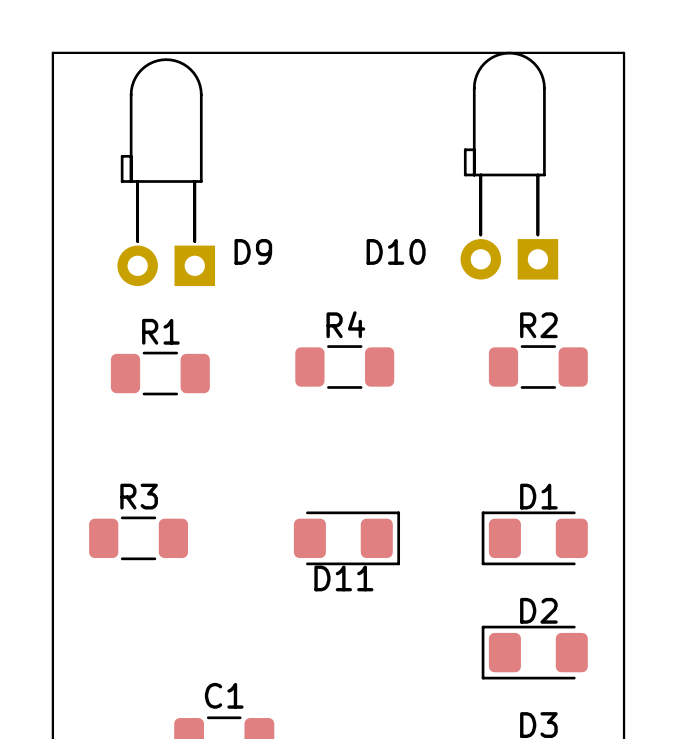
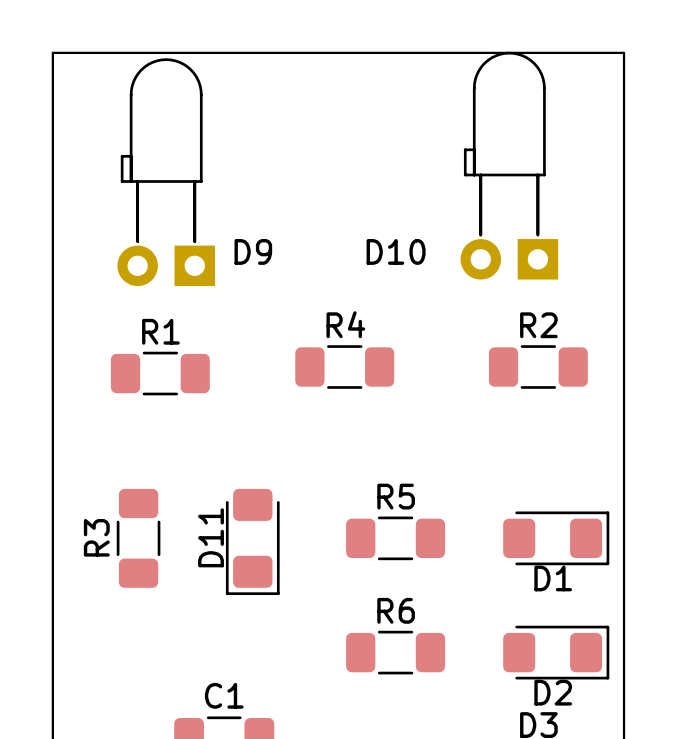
R3 name position: R3 (139, 496) -> R3 (96, 537)
R3 rotation: 0° (138, 538) -> 90° clockwise (138, 538)
D11 rotation: 0° (346, 538) -> 90° clockwise (252, 541)
D11 position: (346, 538) -> (252, 541)
R5: none -> (395, 538)
D1 rotation: 0° (534, 538) -> 180° (556, 538)
R6: none -> (395, 652)
D2 rotation: 0° (534, 652) -> 180° (556, 652)

